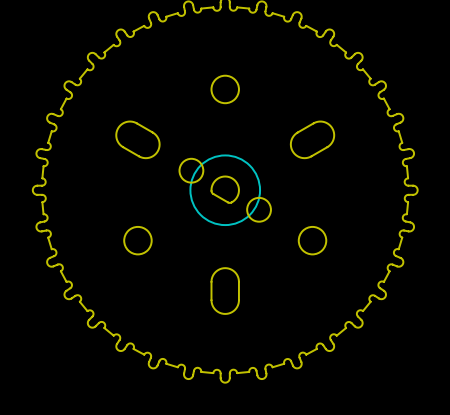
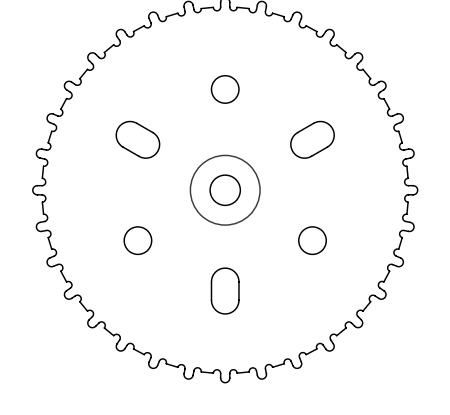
round board edge: [179, 158, 204, 183] -> none
round board edge: none -> [210, 175, 241, 206]
board edge: (211, 190) (213, 193) (230, 202) (236, 197) (238, 189) (234, 180) (225, 176) (214, 181) (211, 190) -> none
round board edge: [247, 197, 271, 222] -> none

